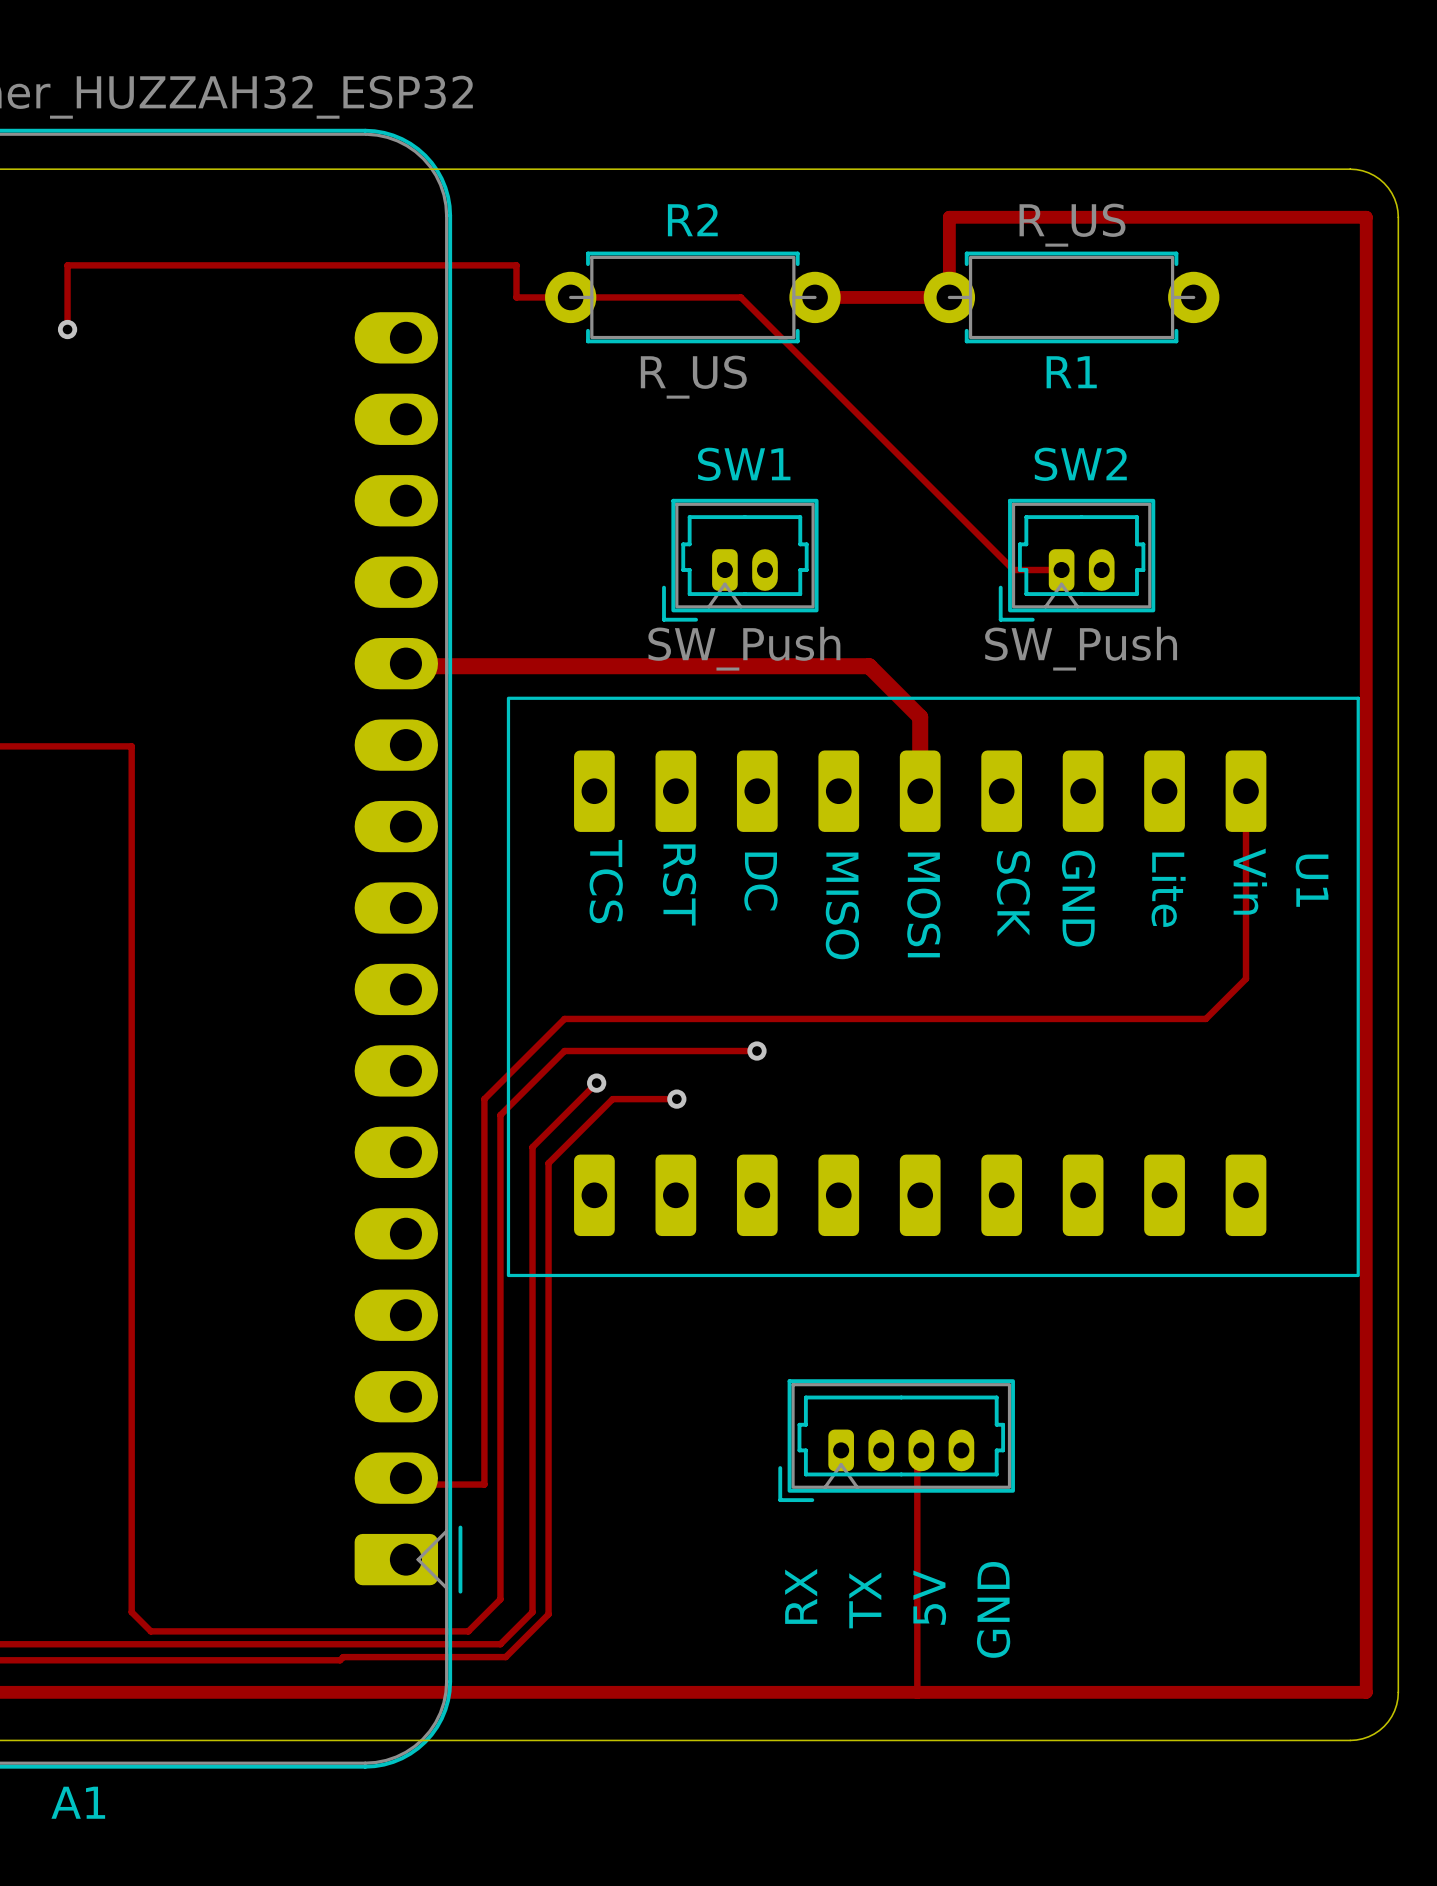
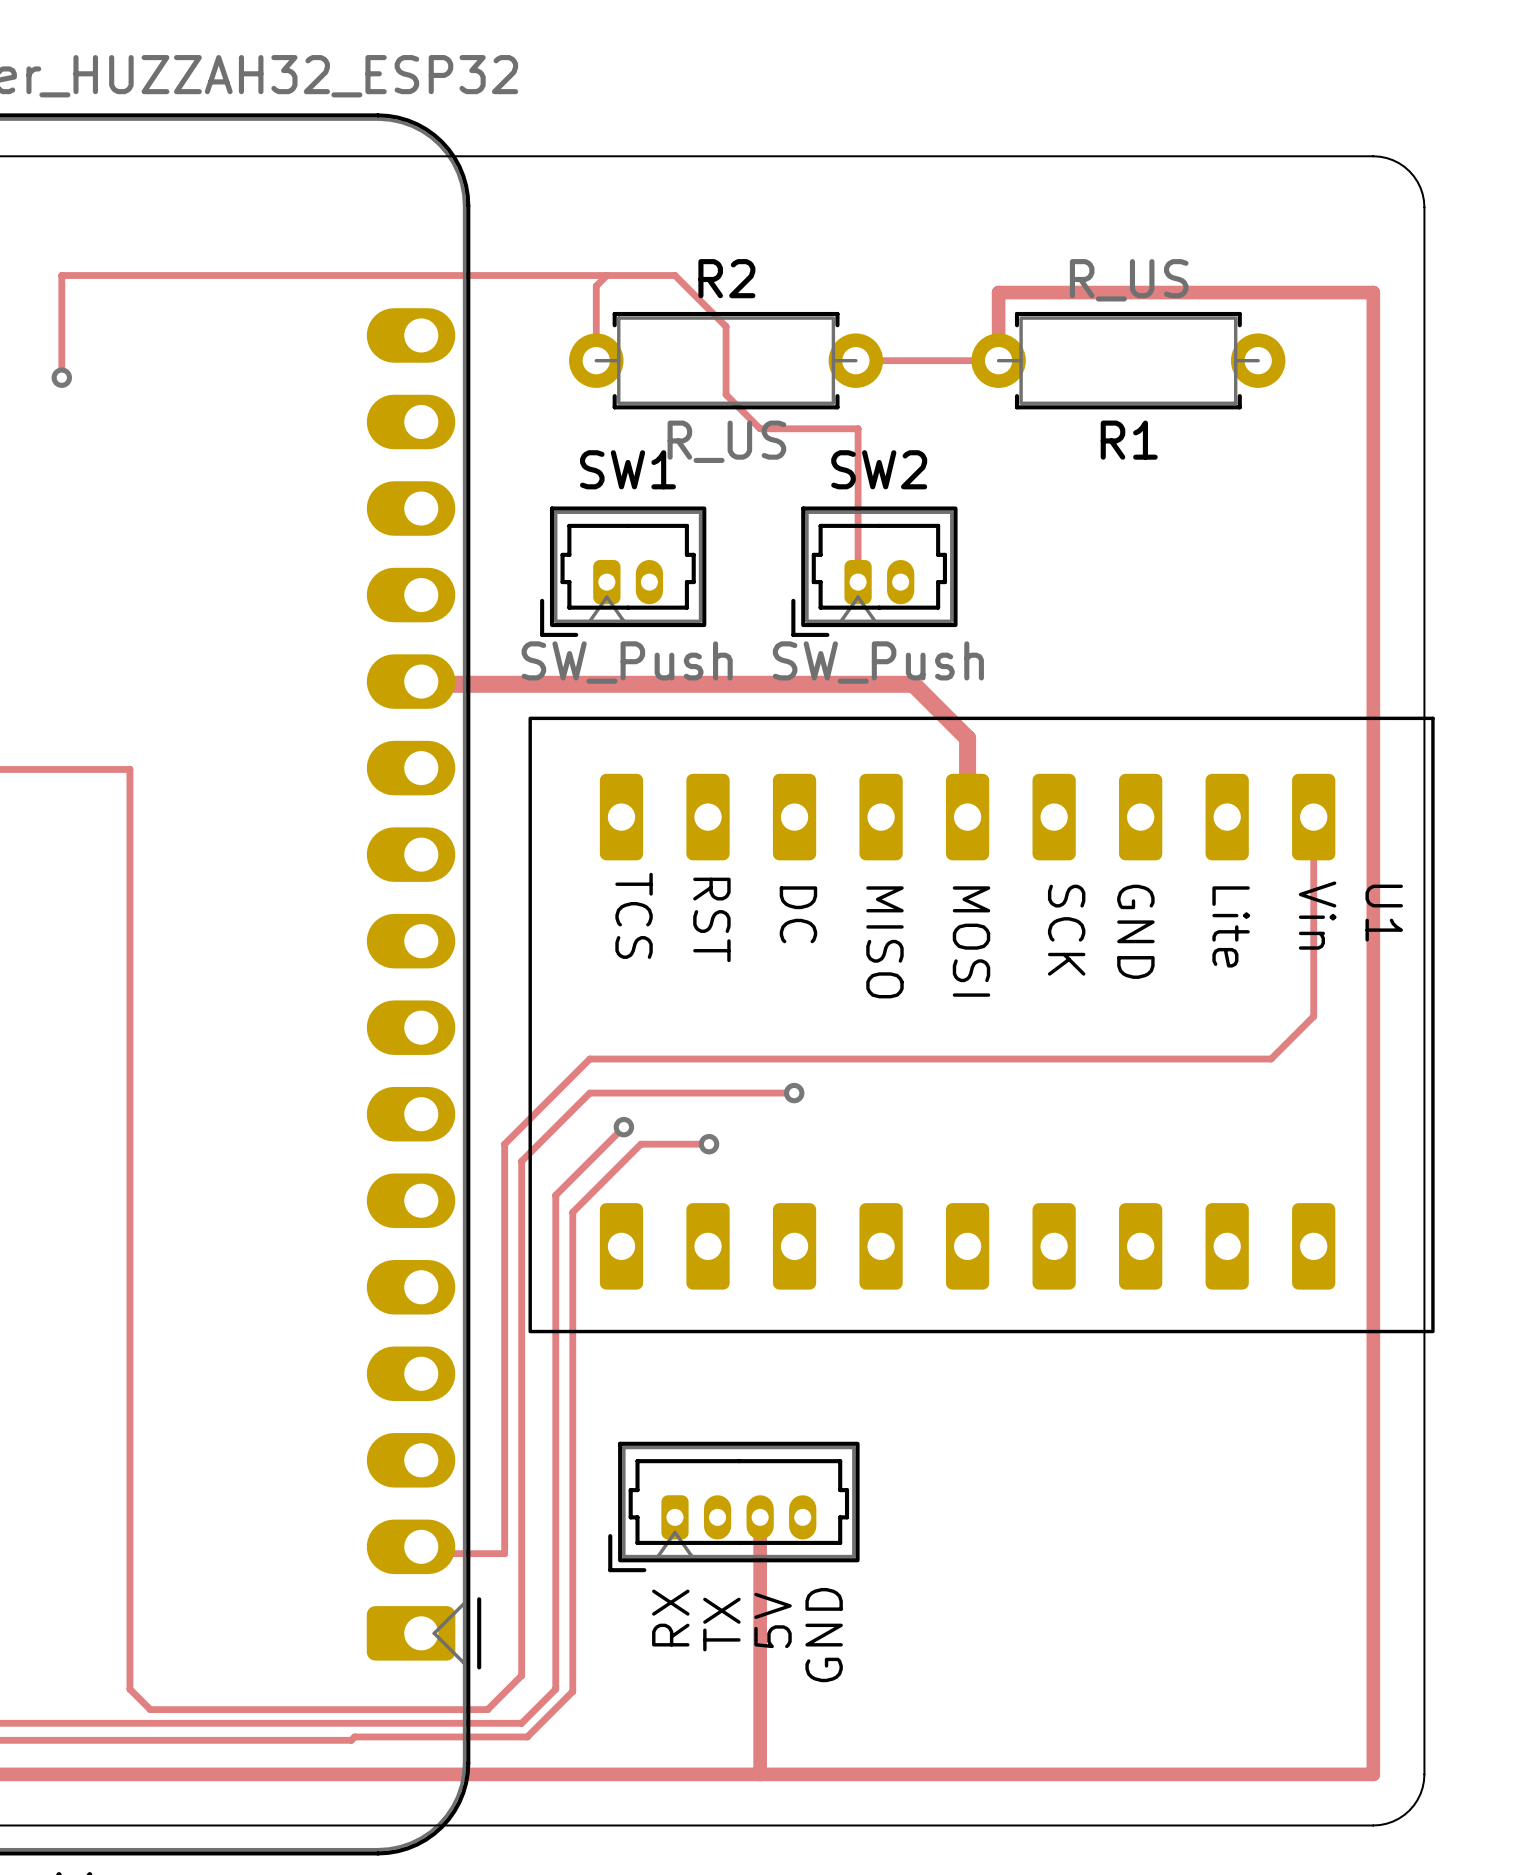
board edge: (1302, 169) (1356, 169) (1374, 175) (1384, 183) (1391, 193) (1396, 204) (1398, 217) (1398, 1692) (1396, 1704) (1391, 1716) (1384, 1726) (1374, 1734) (1356, 1740) (1302, 1740) -> (1373, 156) (1392, 160) (1409, 171) (1420, 187) (1424, 207) (1424, 1774) (1420, 1793) (1409, 1810) (1392, 1821) (1373, 1825)
track: (67, 281) (67, 265) (516, 265) (516, 297) (740, 297) (1013, 570) (1061, 570) -> (61, 275) (674, 275) (726, 326) (726, 394) (760, 428) (858, 428) (858, 582)
track: none -> (606, 275) (596, 286) (596, 360)
R2 position: (692, 297) -> (726, 360)
track: (815, 297) (949, 297) (949, 217) (1366, 217) (1366, 1692) (1302, 1692) -> (855, 360) (998, 360) (998, 292) (1373, 292) (1373, 1774)
R1 position: (1071, 297) -> (1128, 360)
track: none -> (61, 326) (61, 377)
via position: (67, 329) -> (61, 377)
SW1 position: (740, 560) -> (623, 571)
SW2 position: (1077, 560) -> (874, 571)
part position: (896, 1440) -> (733, 1506)
track: none -> (760, 1517) (760, 1774)
track: (921, 1450) (917, 1451) (917, 1692) -> none
text position: RX (801, 1596) -> RX (670, 1618)
text position: 5V (929, 1597) -> 5V (773, 1620)
text position: TX (865, 1600) -> TX (721, 1624)
text position: GND (993, 1609) -> GND (824, 1635)

